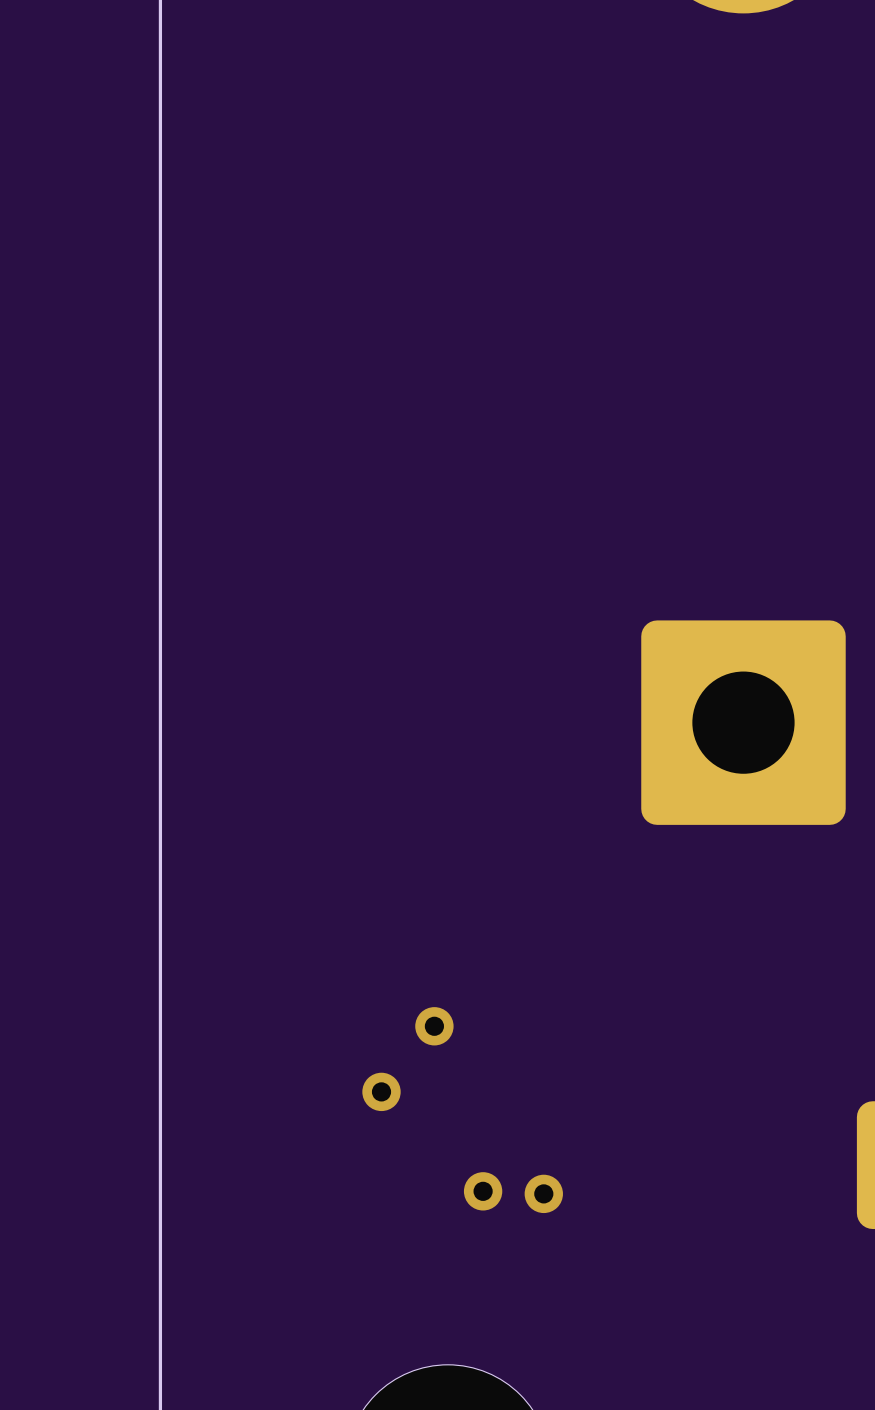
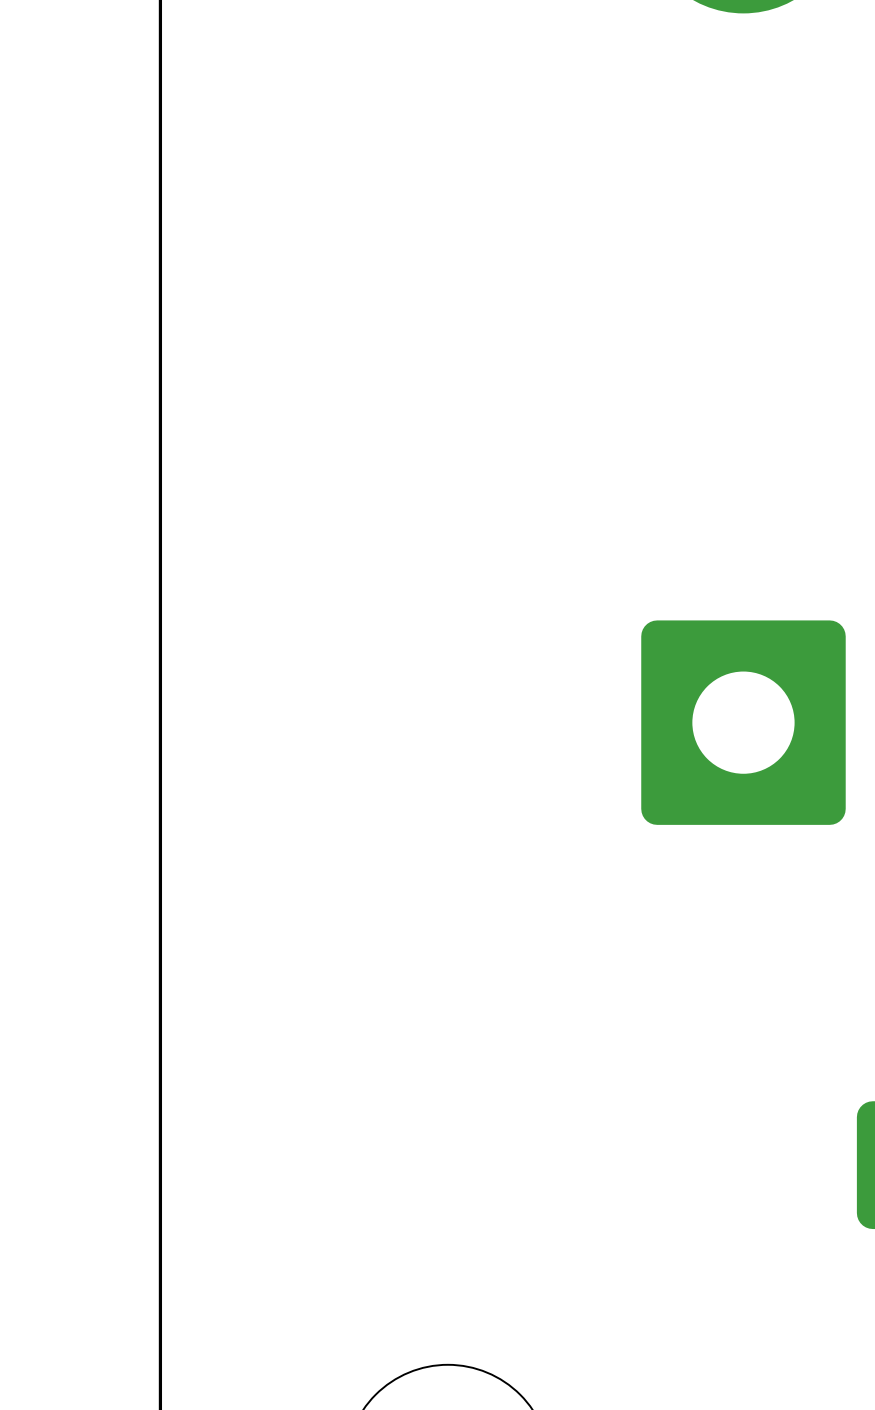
via: (434, 1026) -> none
via: (381, 1091) -> none
via: (483, 1191) -> none
via: (543, 1193) -> none

